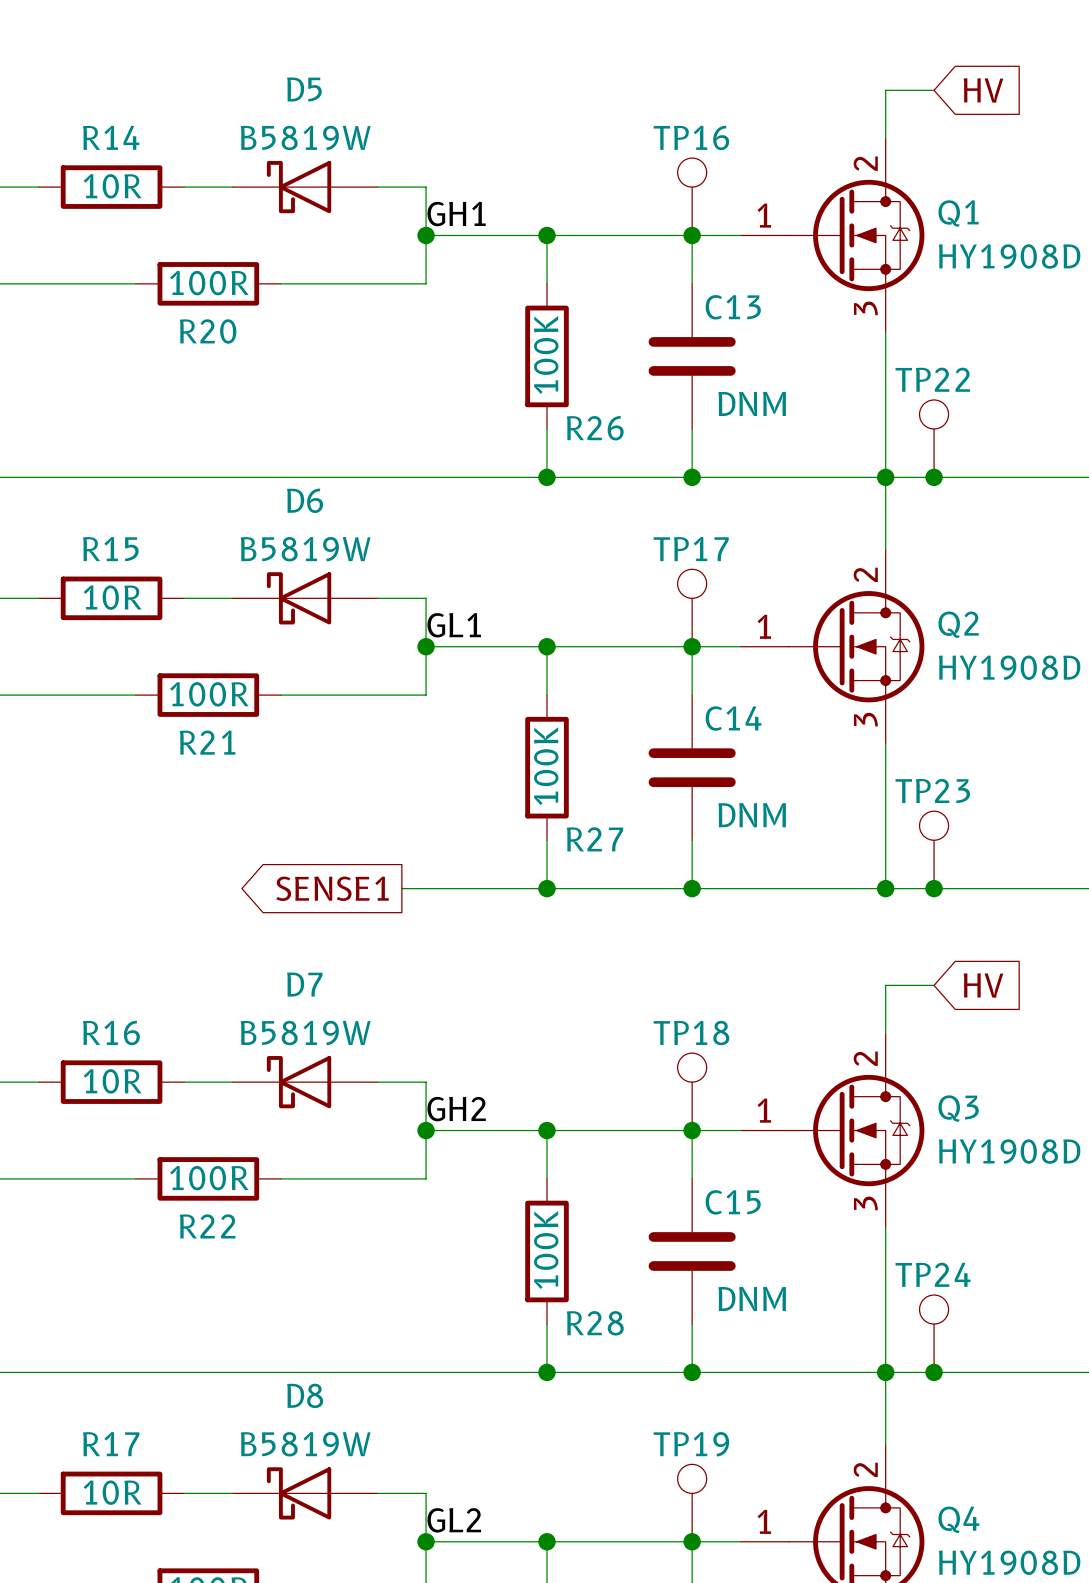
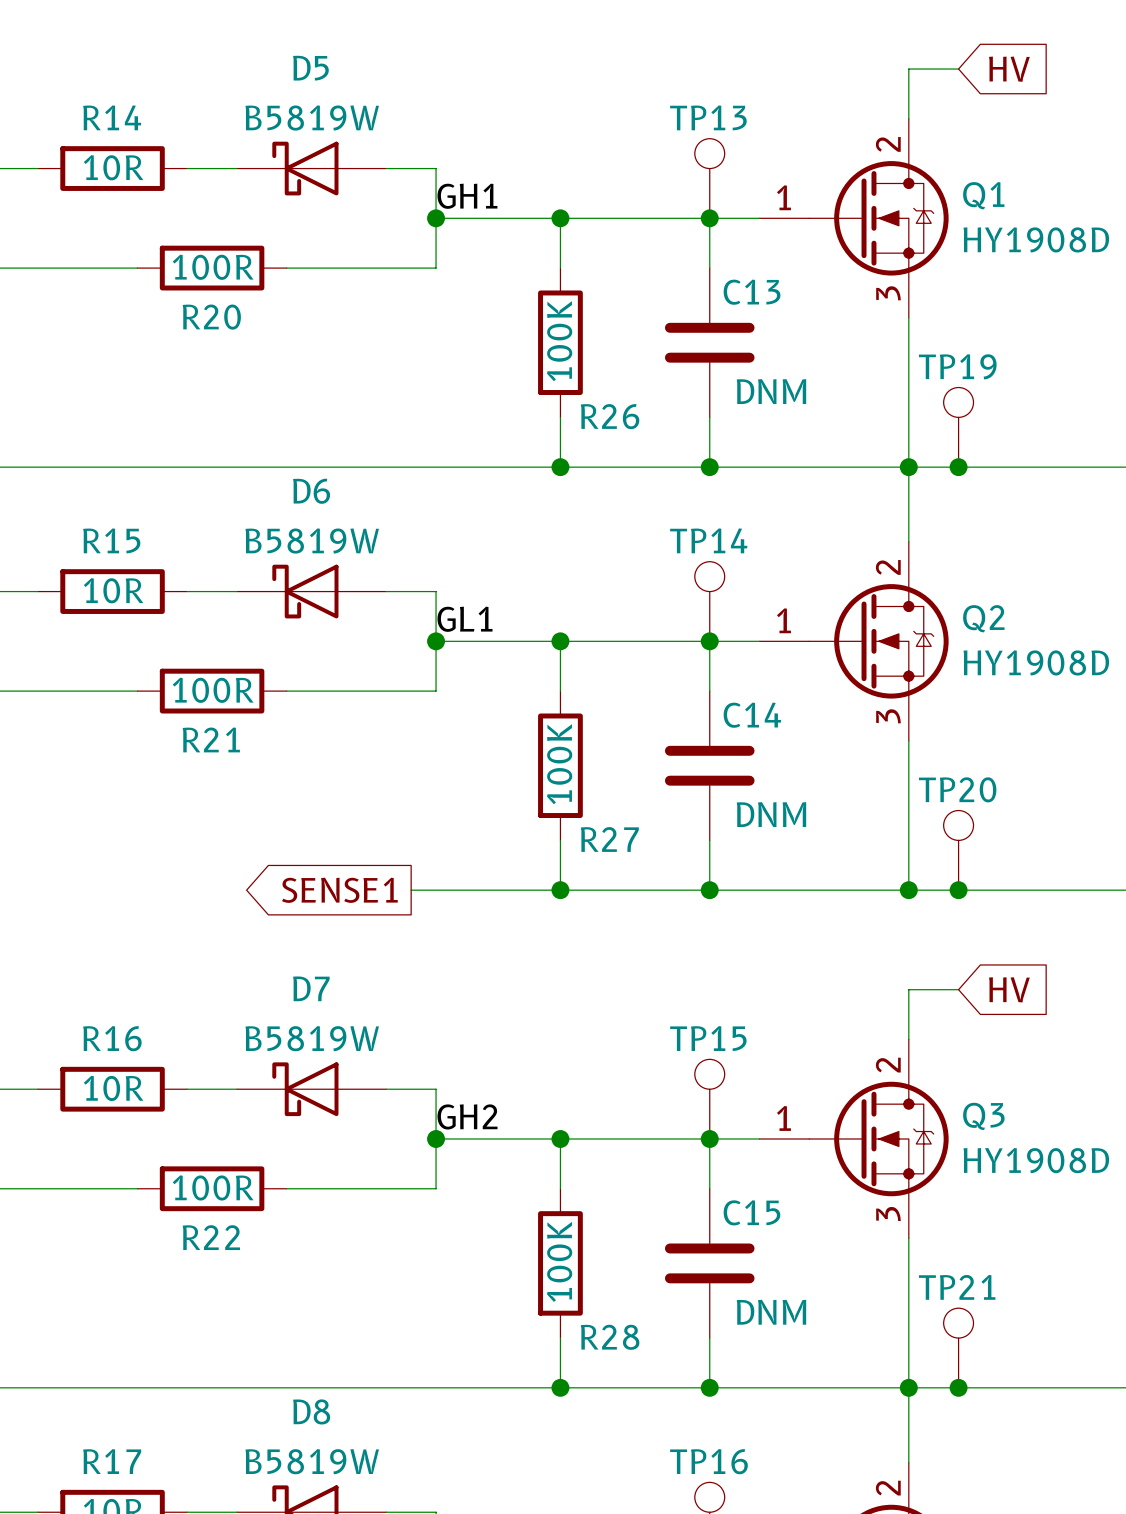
TP16 name: TP16 (691, 137) -> TP13 (708, 117)
TP22 name: TP22 (932, 379) -> TP19 (957, 366)
TP17 name: TP17 (691, 549) -> TP14 (708, 540)
TP23 name: TP23 (932, 790) -> TP20 (957, 789)
TP18 name: TP18 (691, 1033) -> TP15 (708, 1038)
TP24 name: TP24 (933, 1274) -> TP21 (957, 1287)
TP19 name: TP19 (691, 1444) -> TP16 (708, 1461)

